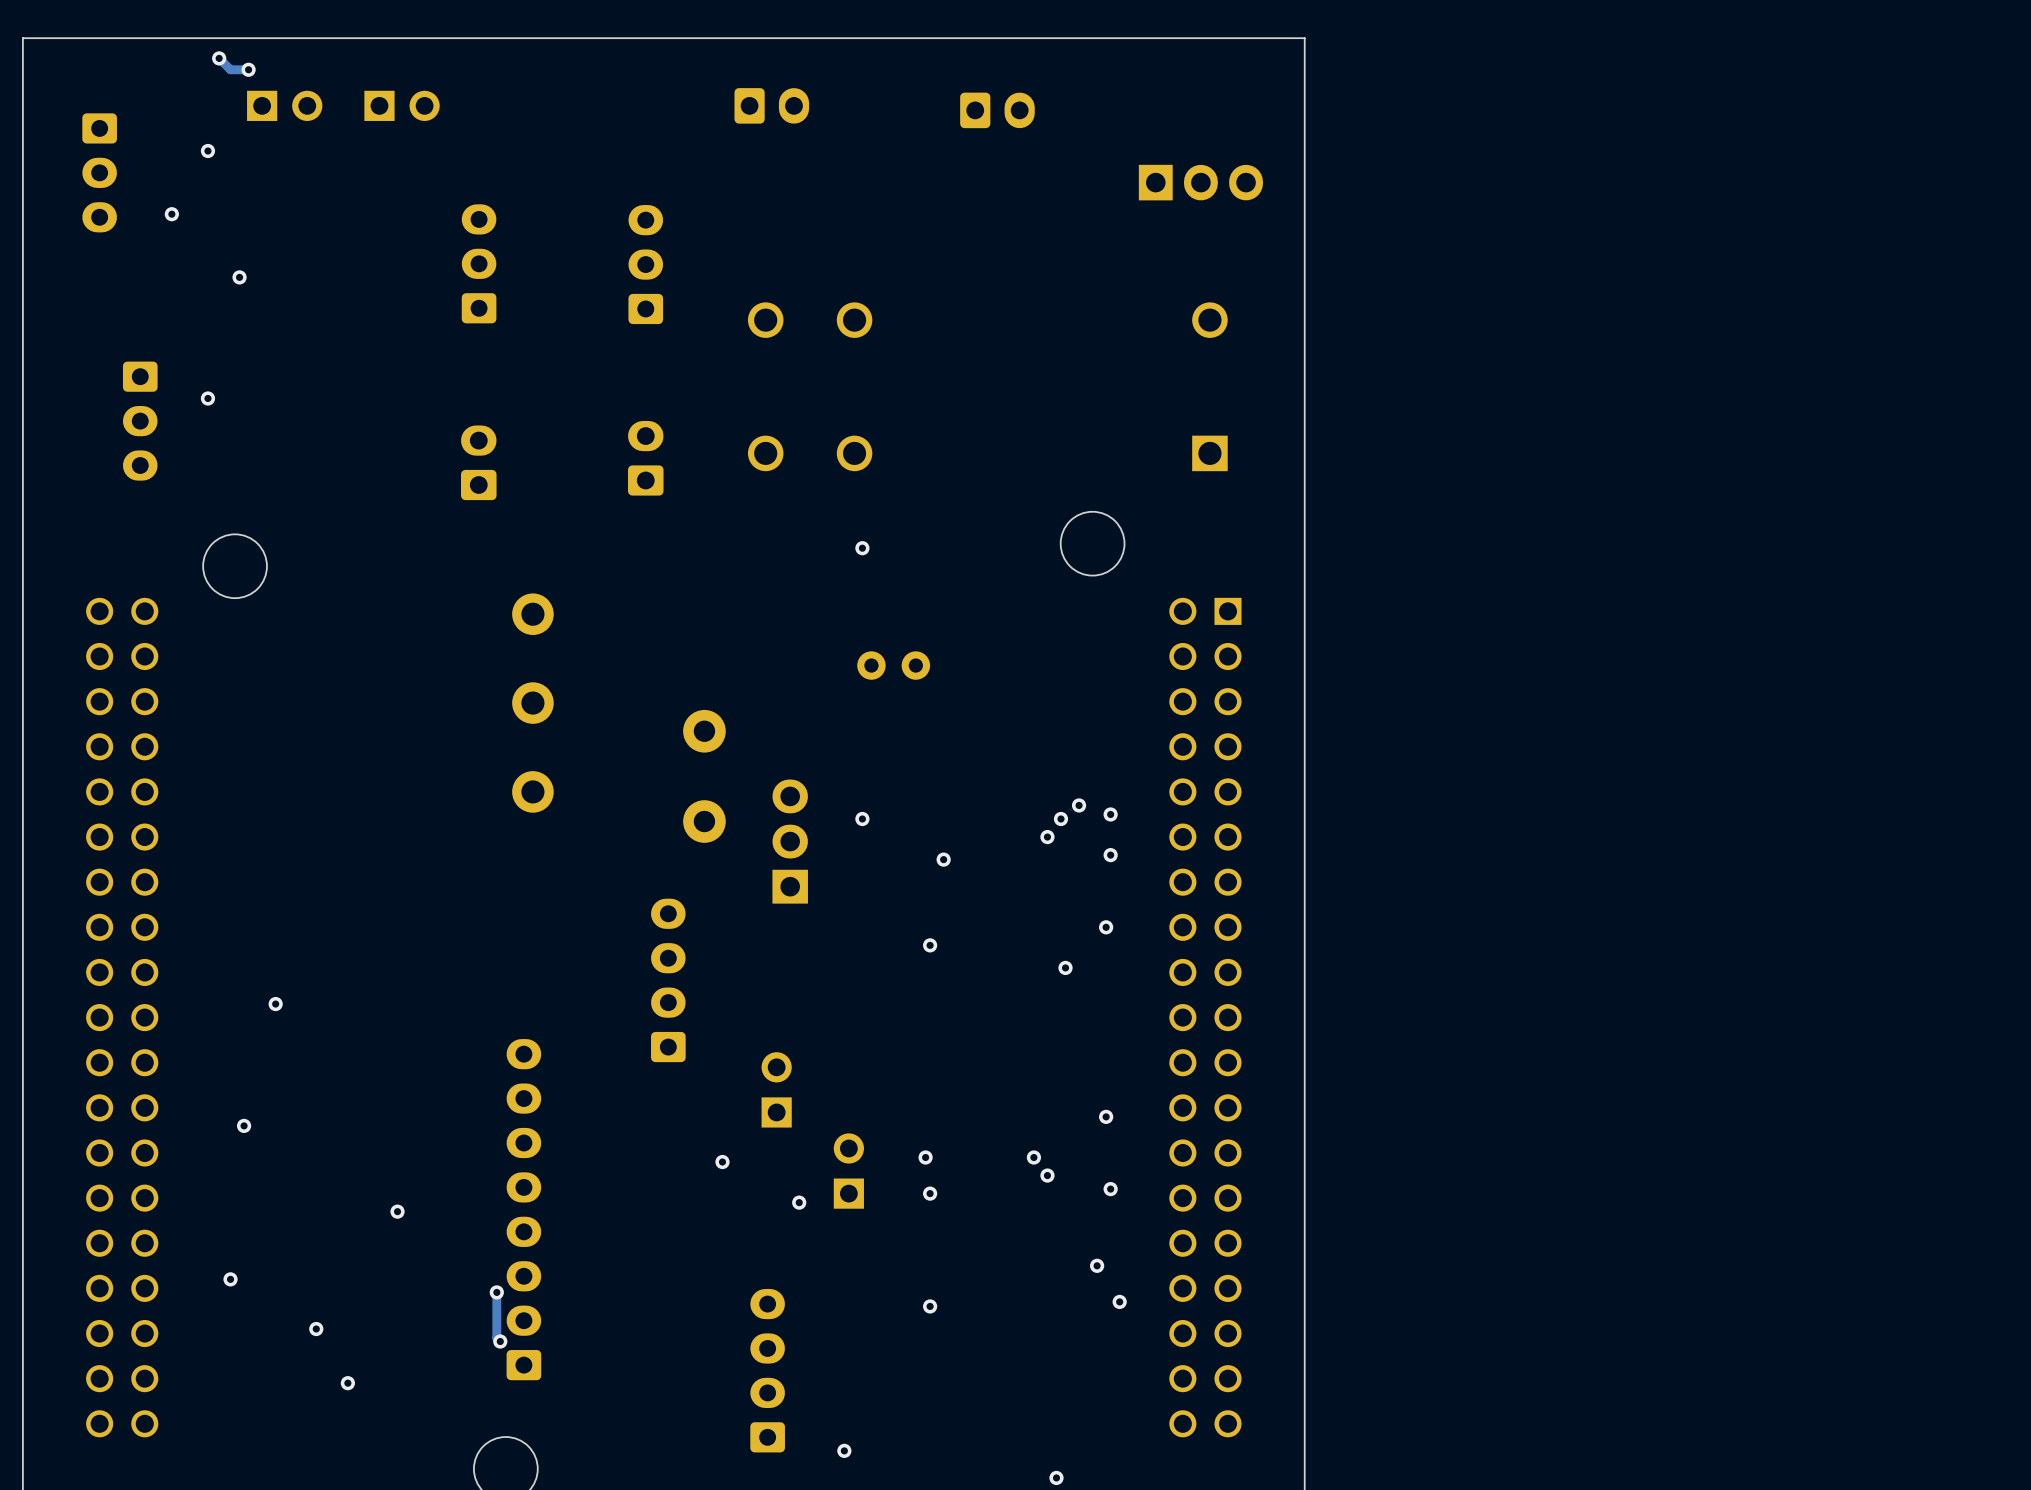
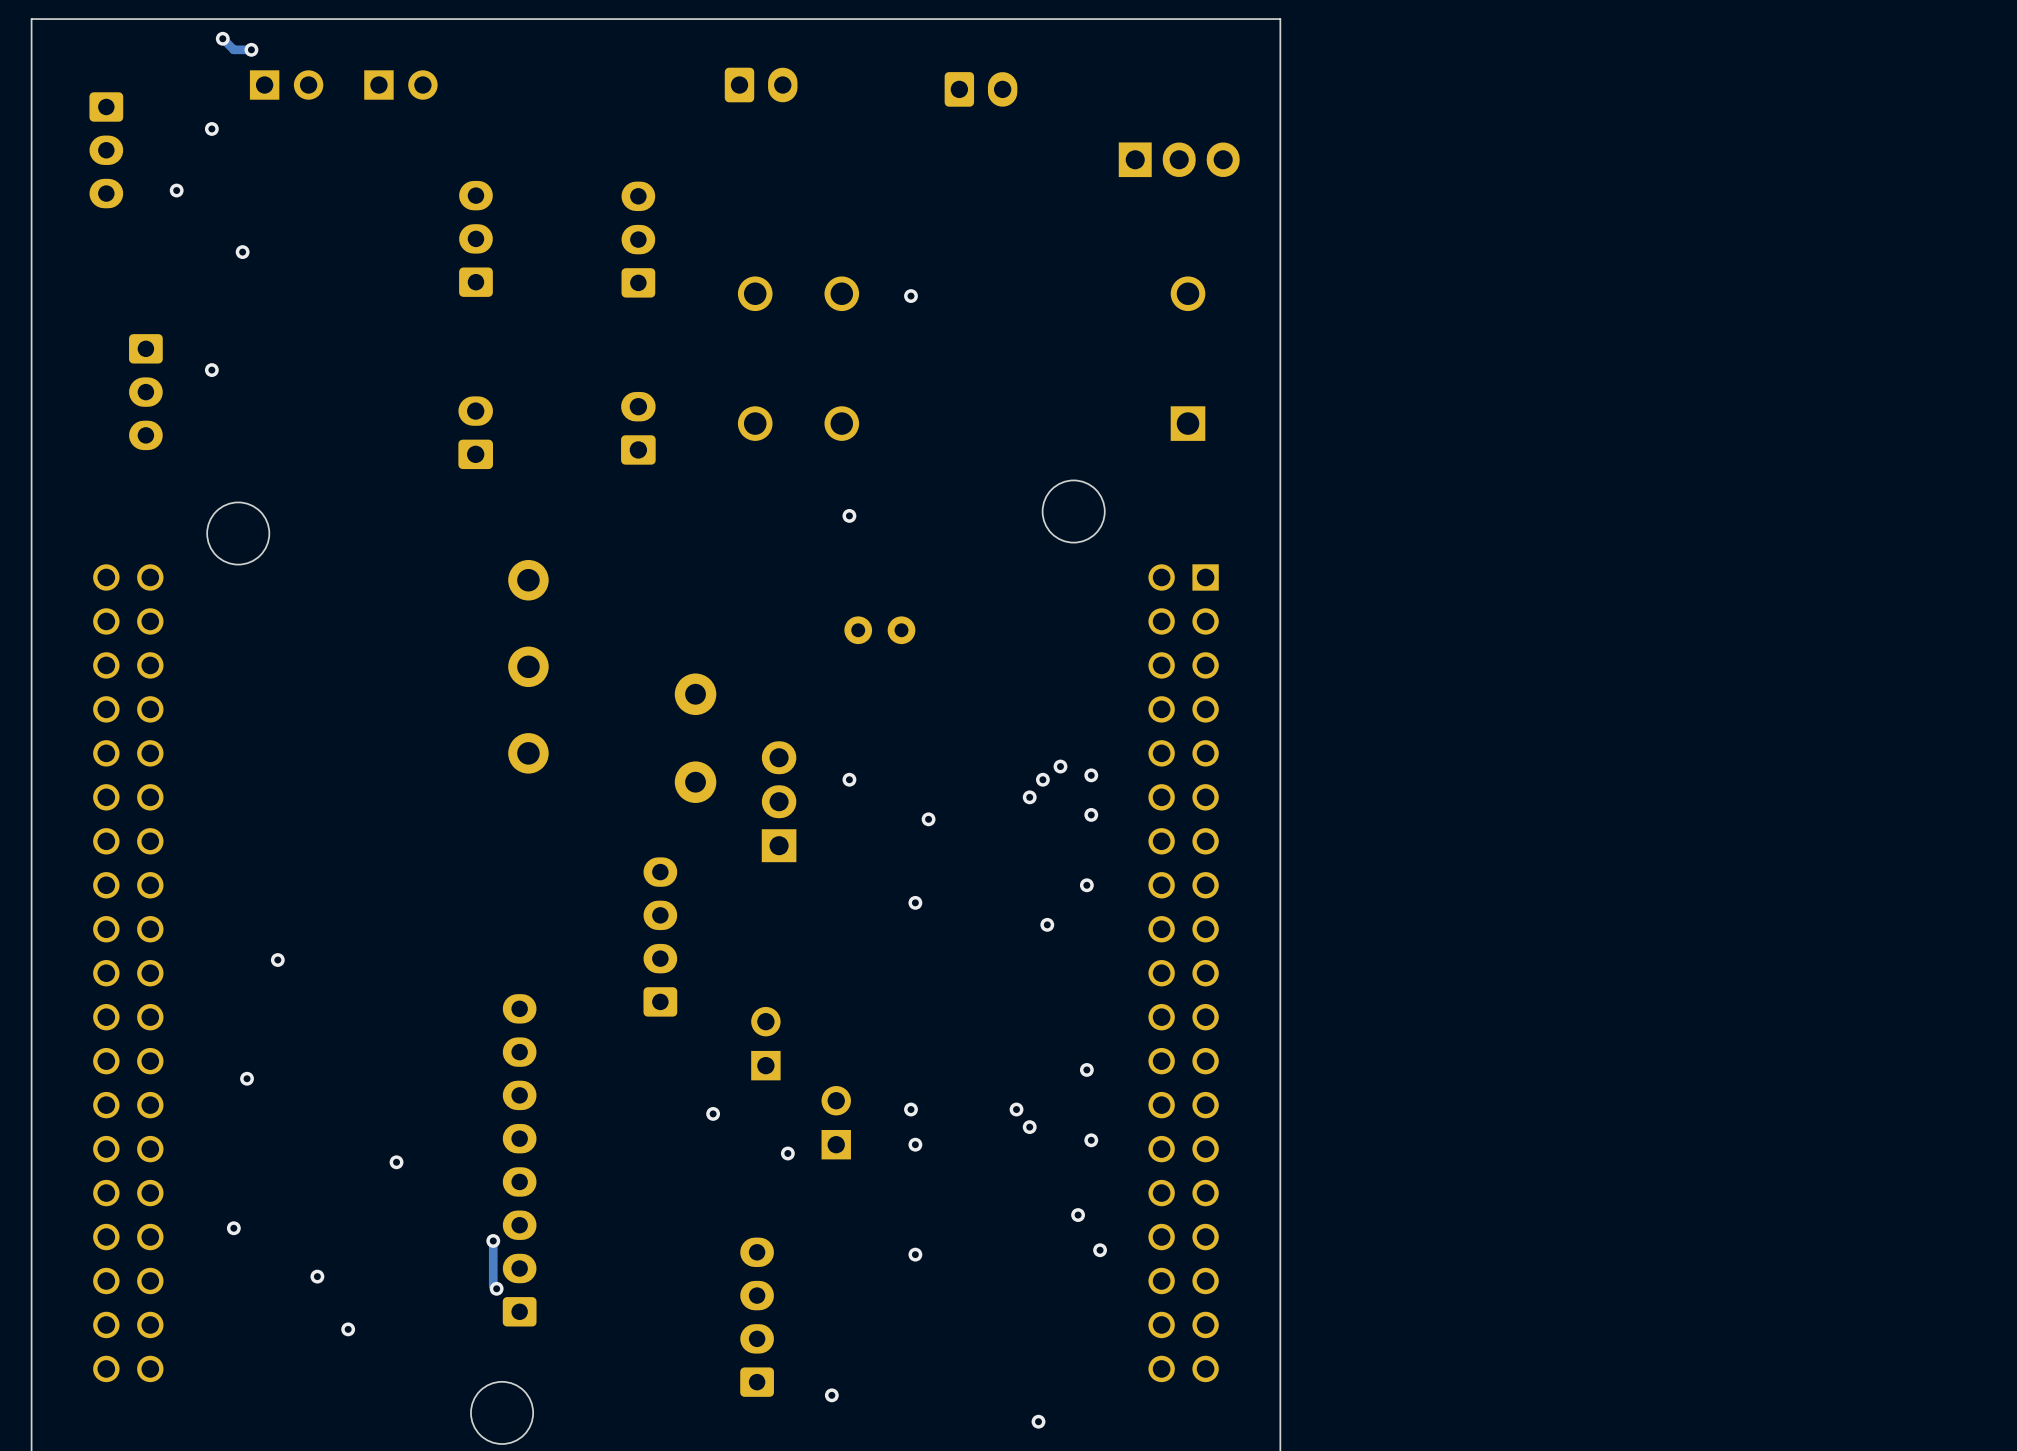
via: none -> (910, 296)

